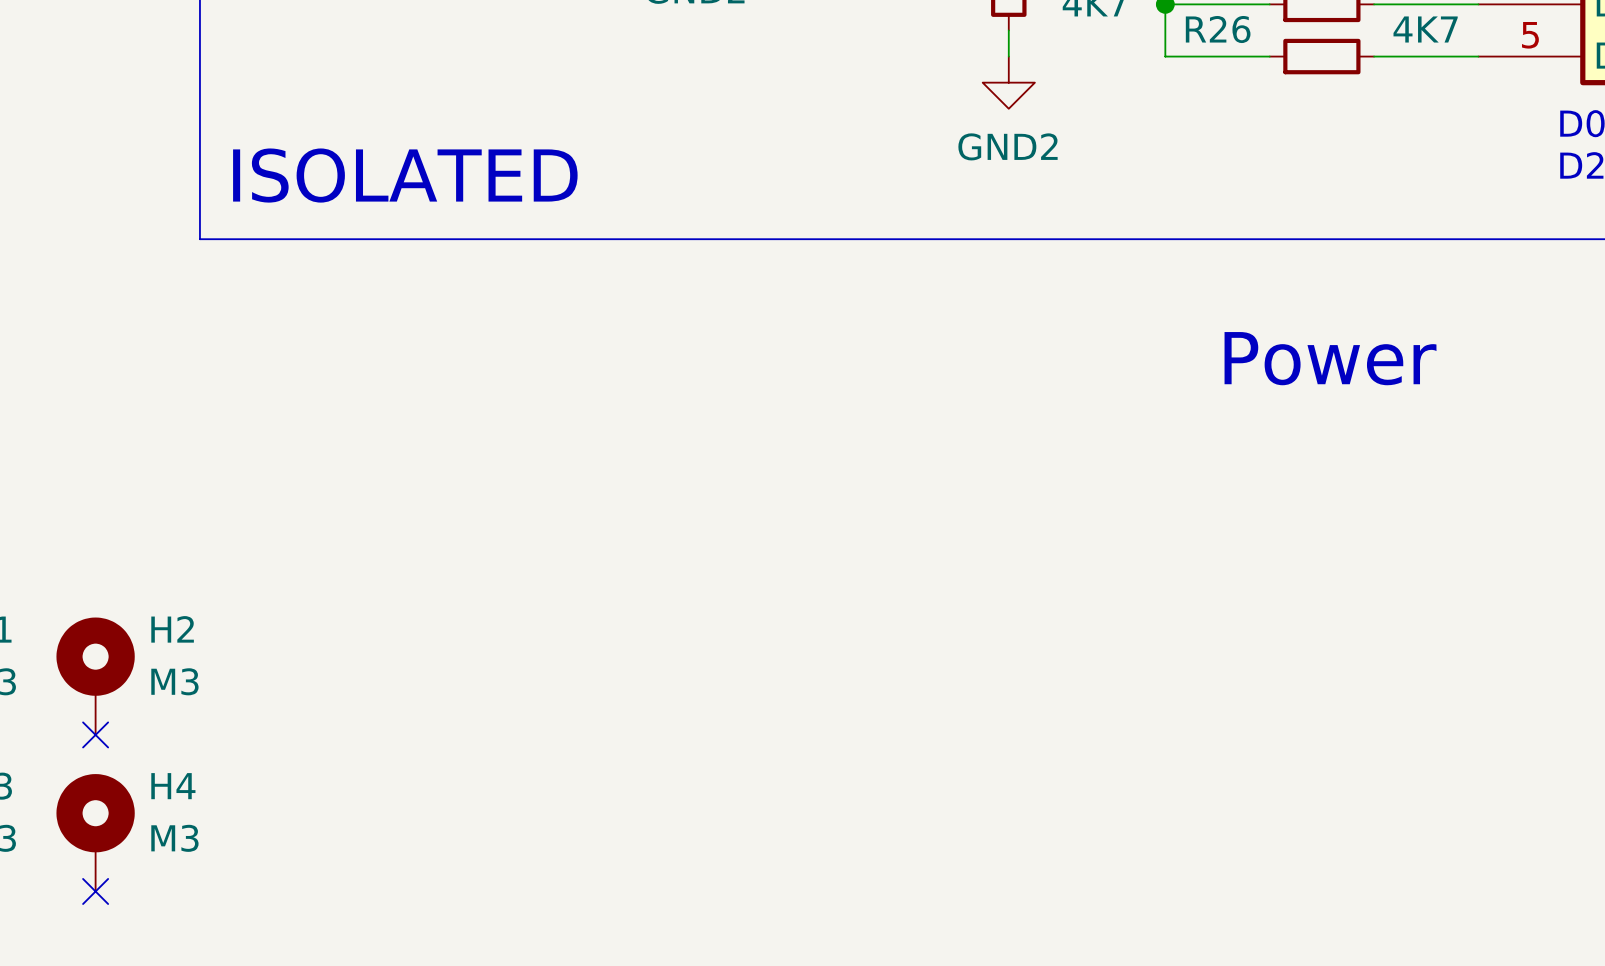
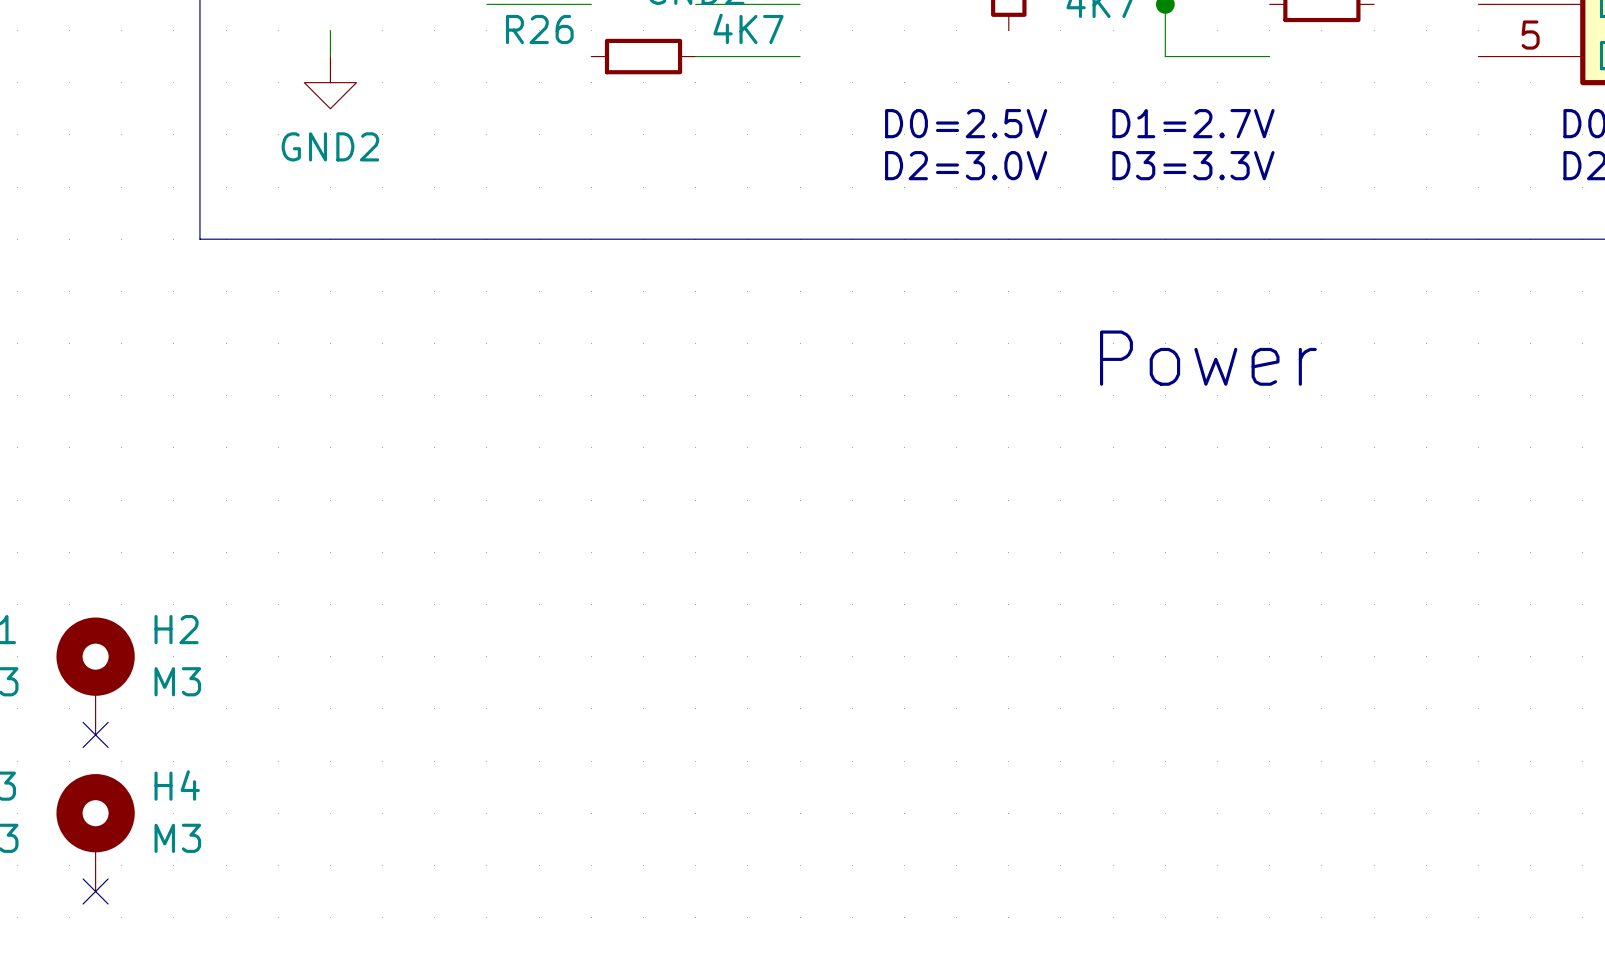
wire: none -> (486, 4) (591, 4)
wire: (1165, 4) (1269, 4) -> (695, 4) (800, 4)
wire: (1374, 4) (1478, 4) -> none
wire: none -> (330, 30) (330, 56)
wire: (1008, 30) (1008, 56) -> none
wire: none -> (695, 56) (800, 56)
R26 position: (1321, 56) -> (643, 56)
wire: (1374, 56) (1478, 56) -> none
power symbol: none -> GND2 (330, 82)
power symbol: GND2 (1008, 82) -> none
text: none -> D0=2.5V D1=2.7V (1079, 123)
text: none -> D2=3.0V D3=3.3V (1079, 165)
text: ISOLATED (405, 175) -> none
text position: Power (1330, 358) -> Power (1208, 358)

